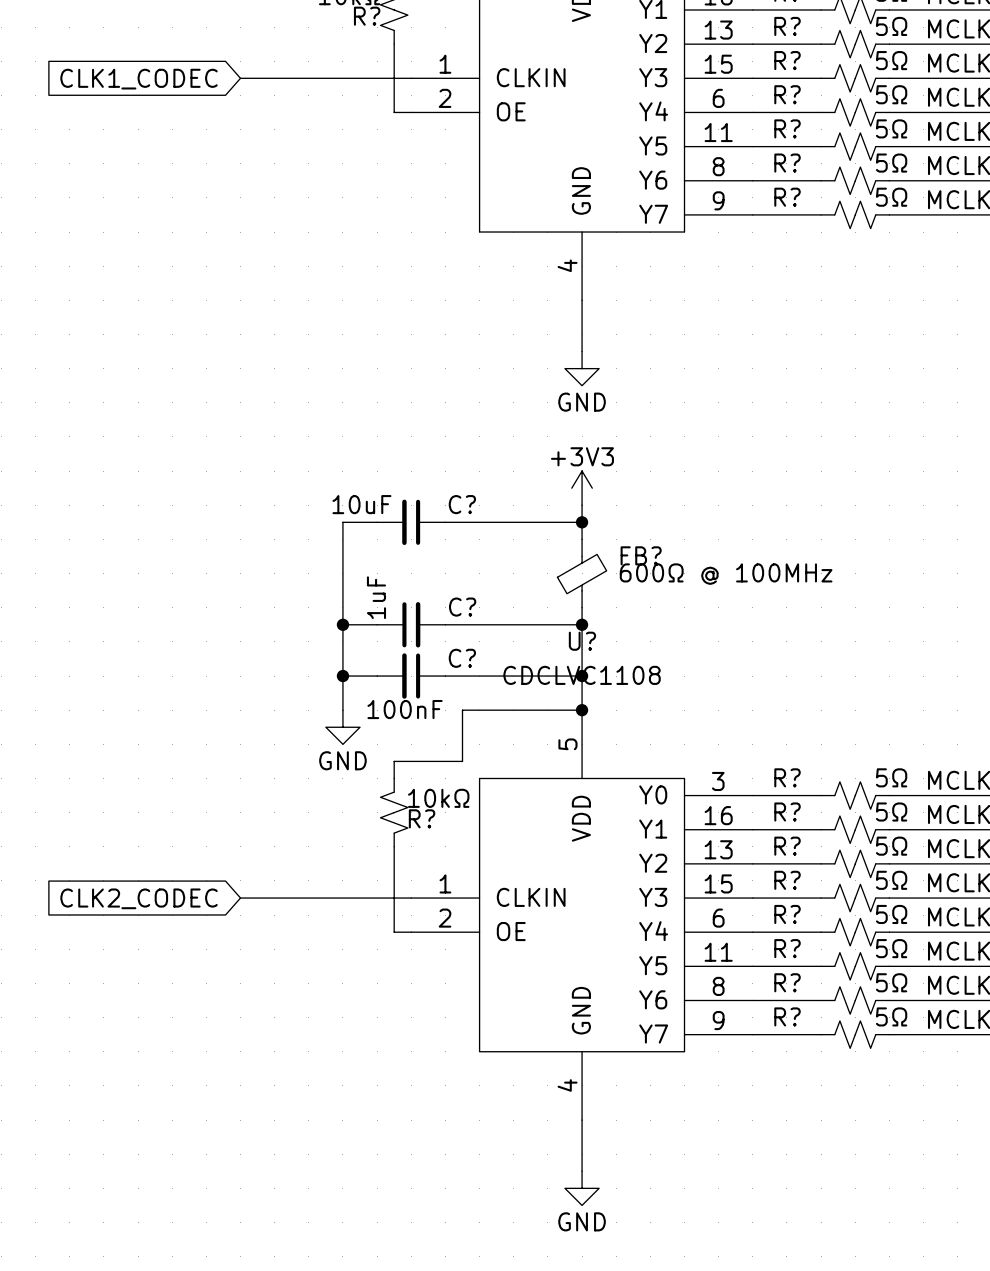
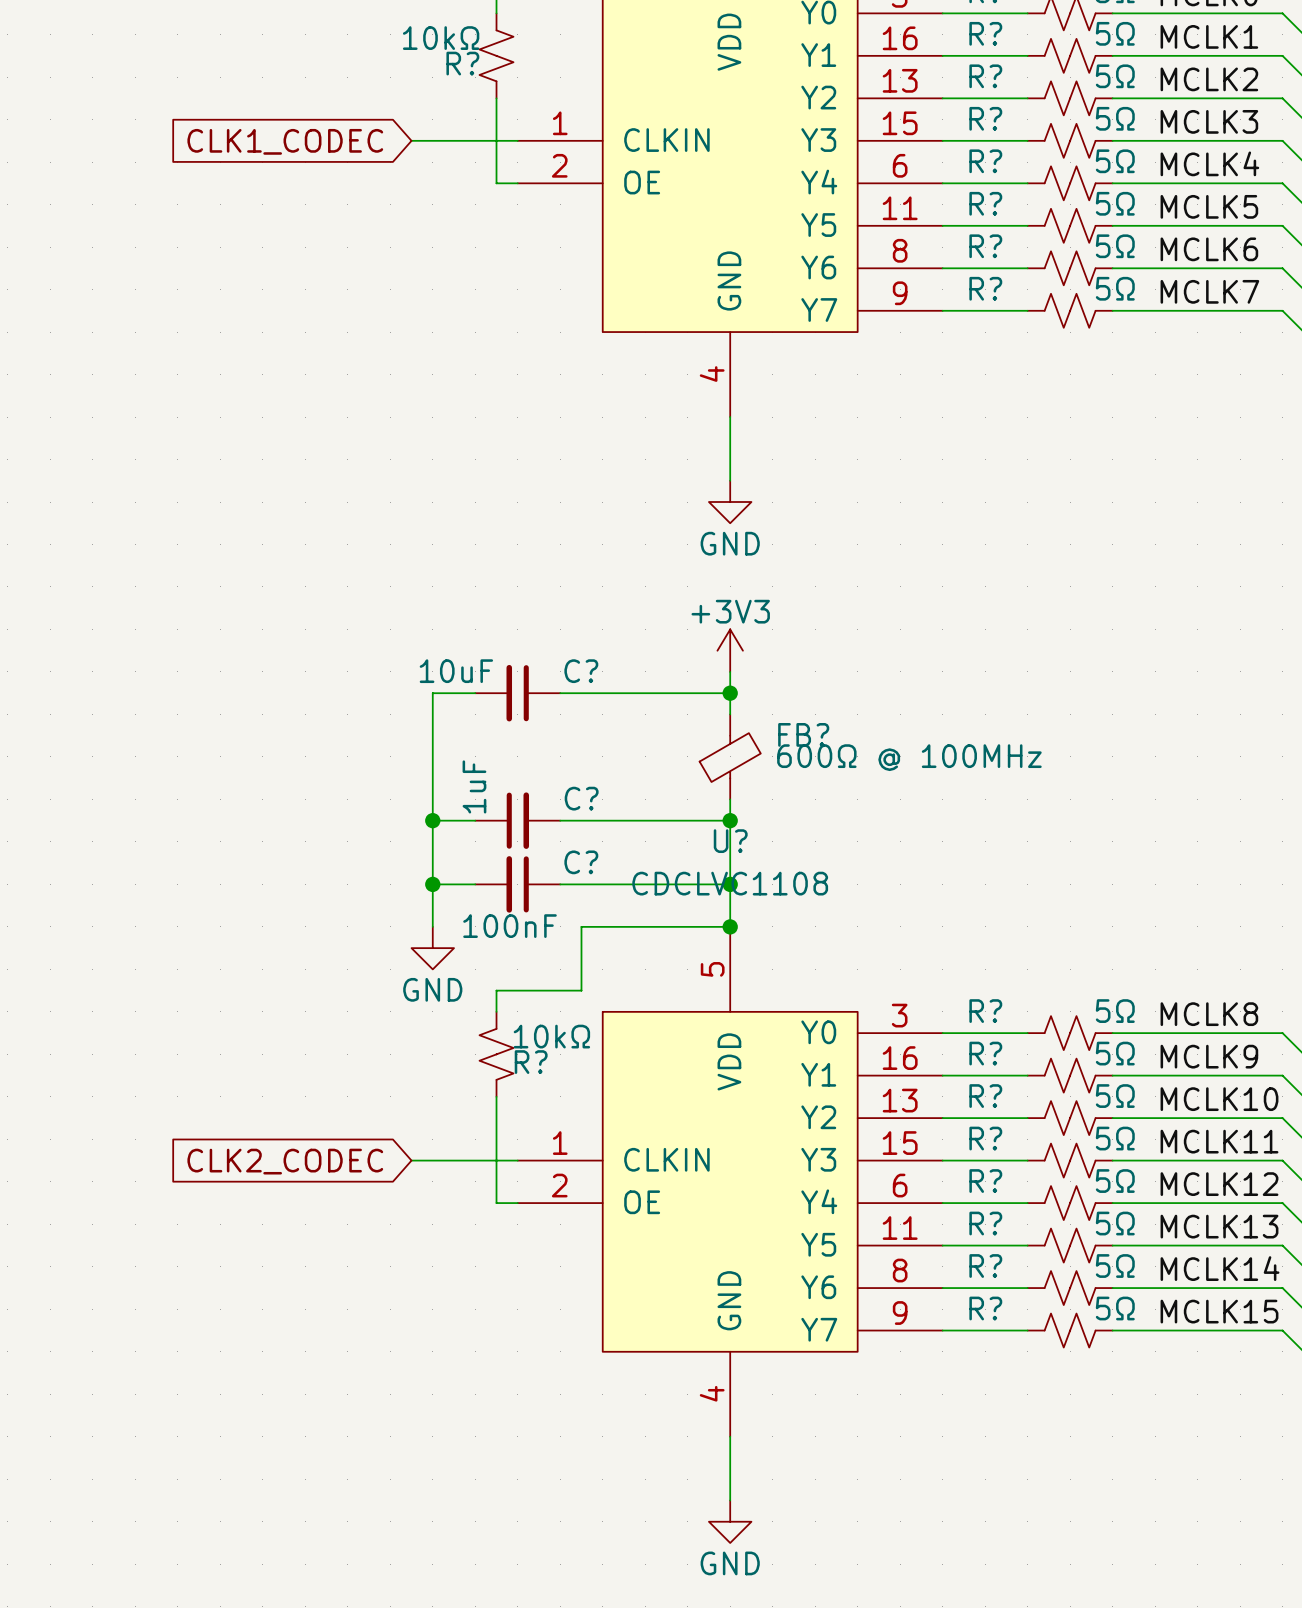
wire: (240, 78) (325, 78) -> none
global label position: CLK1_CODEC (139, 79) -> CLK1_CODEC (285, 141)
global label position: CLK2_CODEC (139, 898) -> CLK2_CODEC (285, 1161)
wire: (240, 898) (325, 898) -> none

